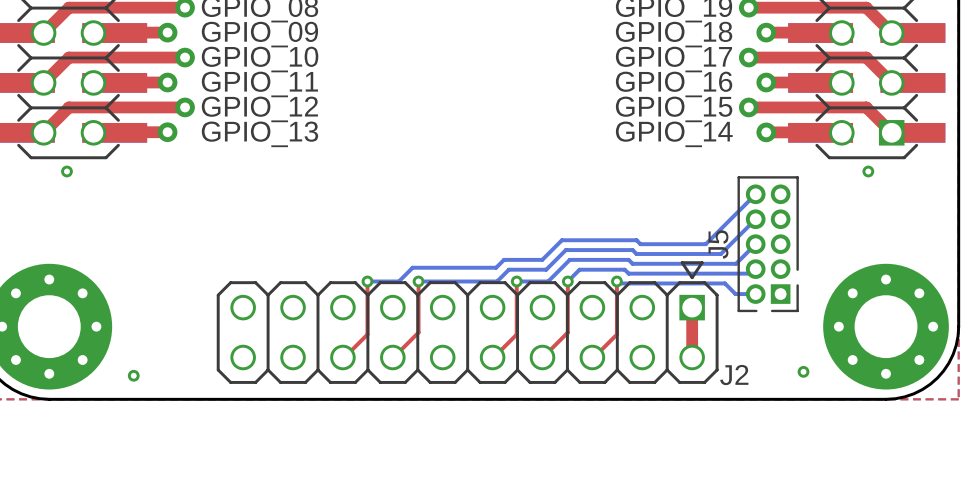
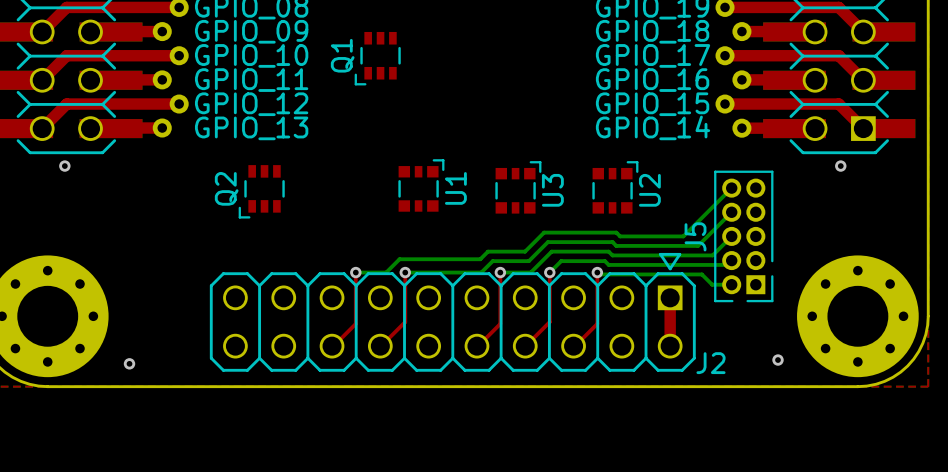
Q1: none -> (377, 58)
U1: none -> (421, 185)
U3: none -> (518, 187)
U2: none -> (615, 187)
Q2: none -> (261, 191)

